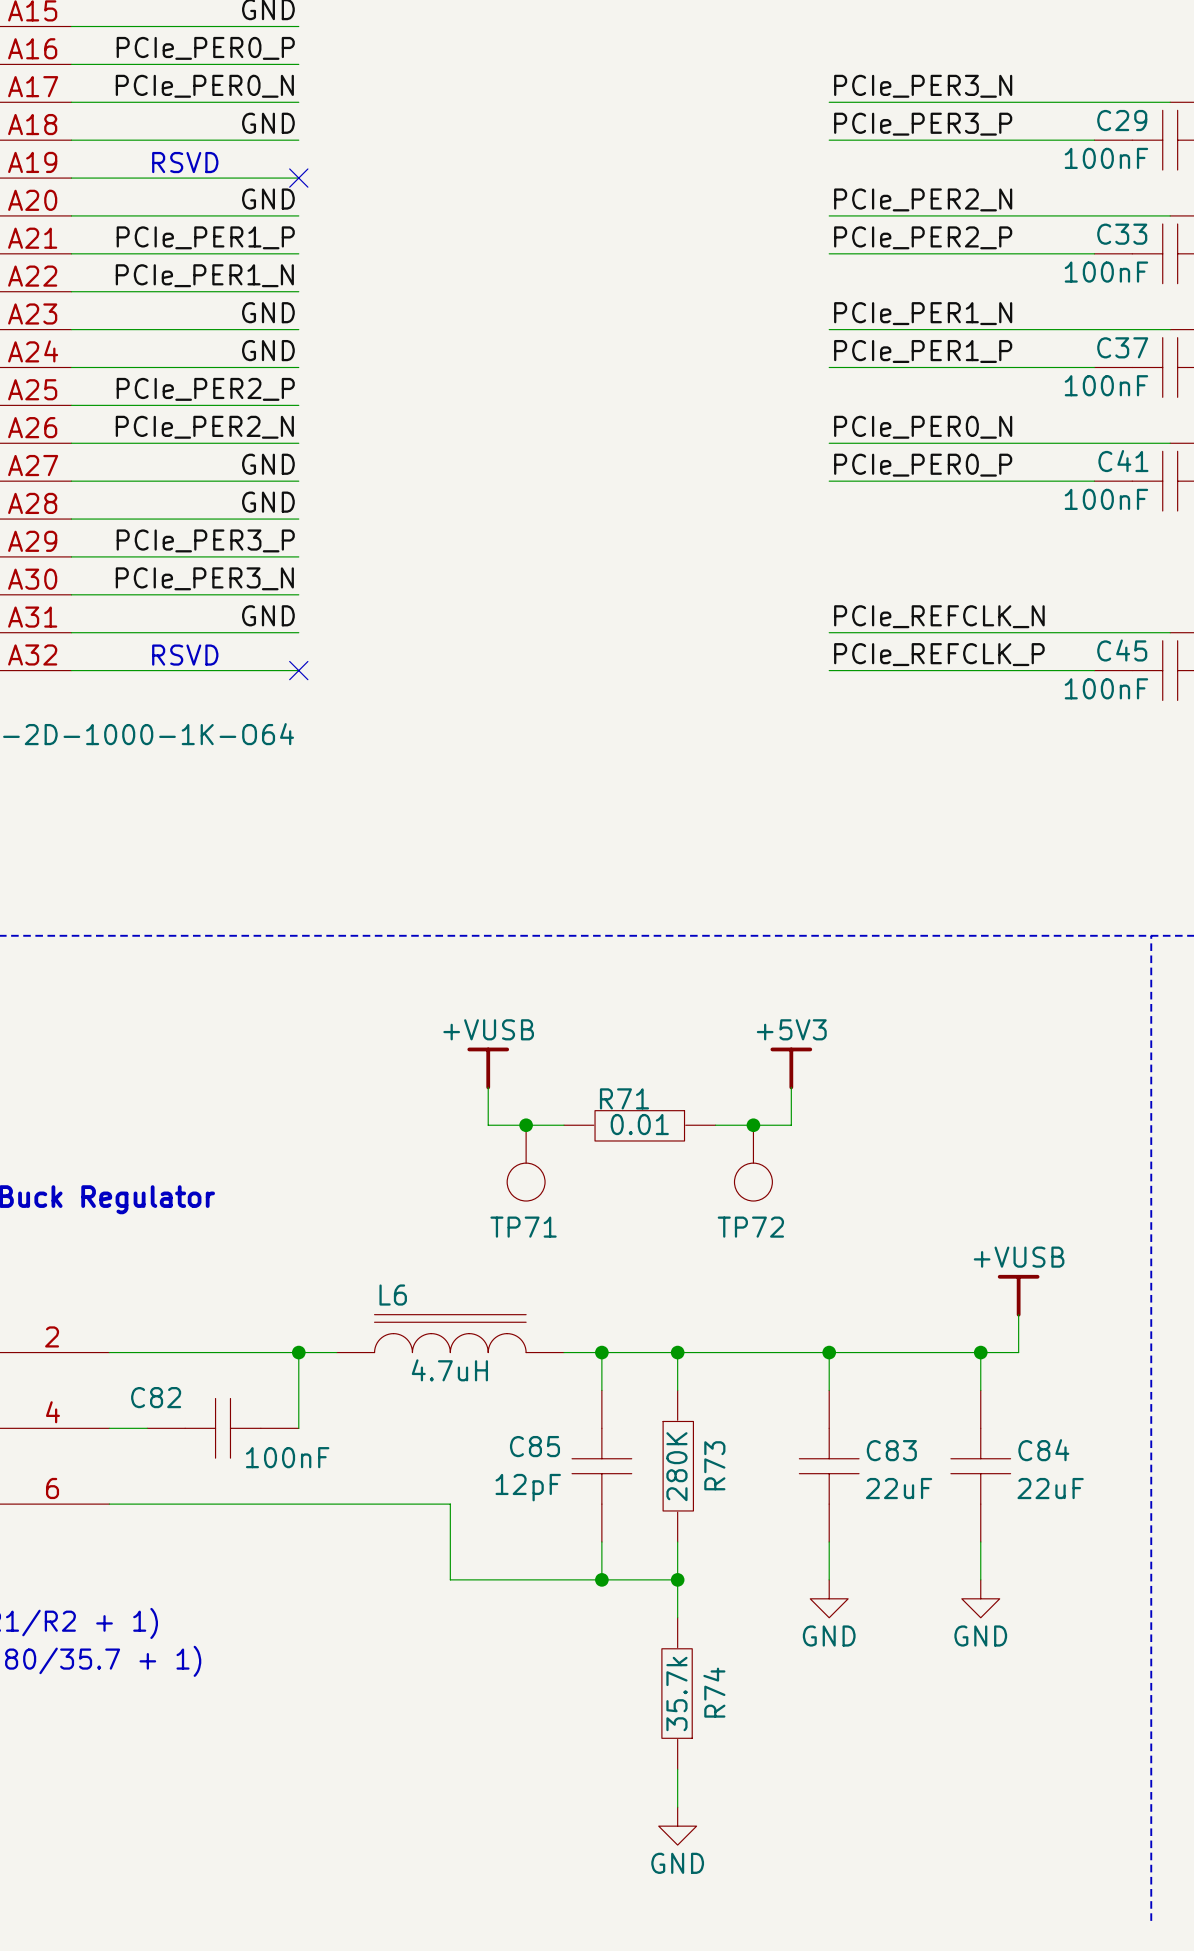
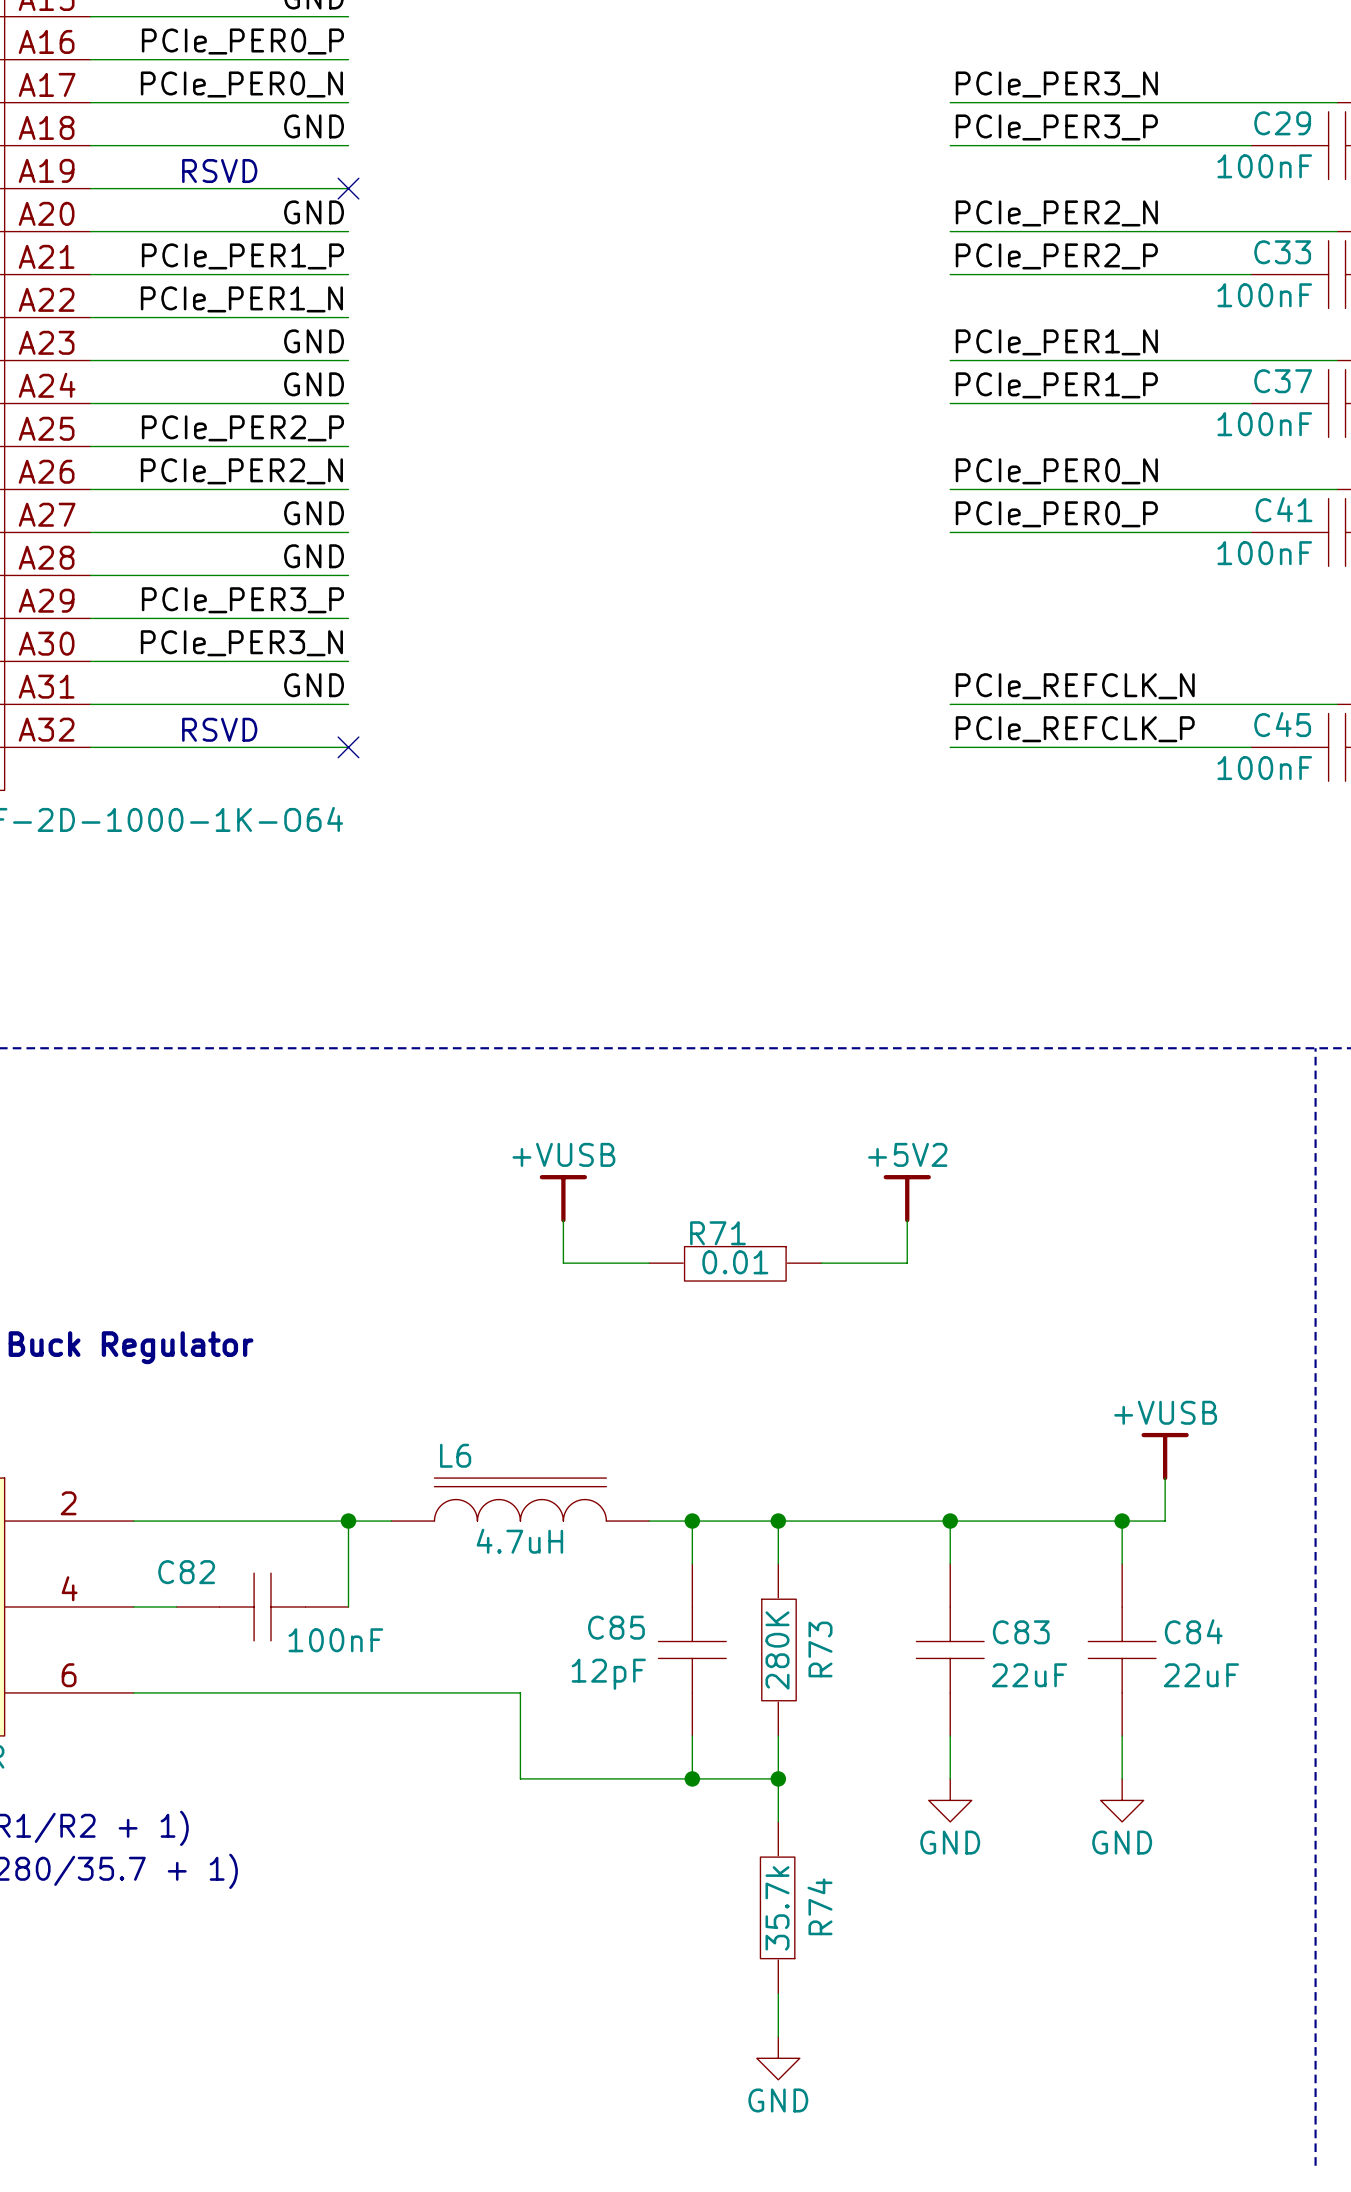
power symbol: +5V3 (791, 1068) -> +5V2 (907, 1198)
junction: (526, 1125) -> none
junction: (753, 1125) -> none
TP71: (526, 1163) -> none
TP72: (753, 1163) -> none

